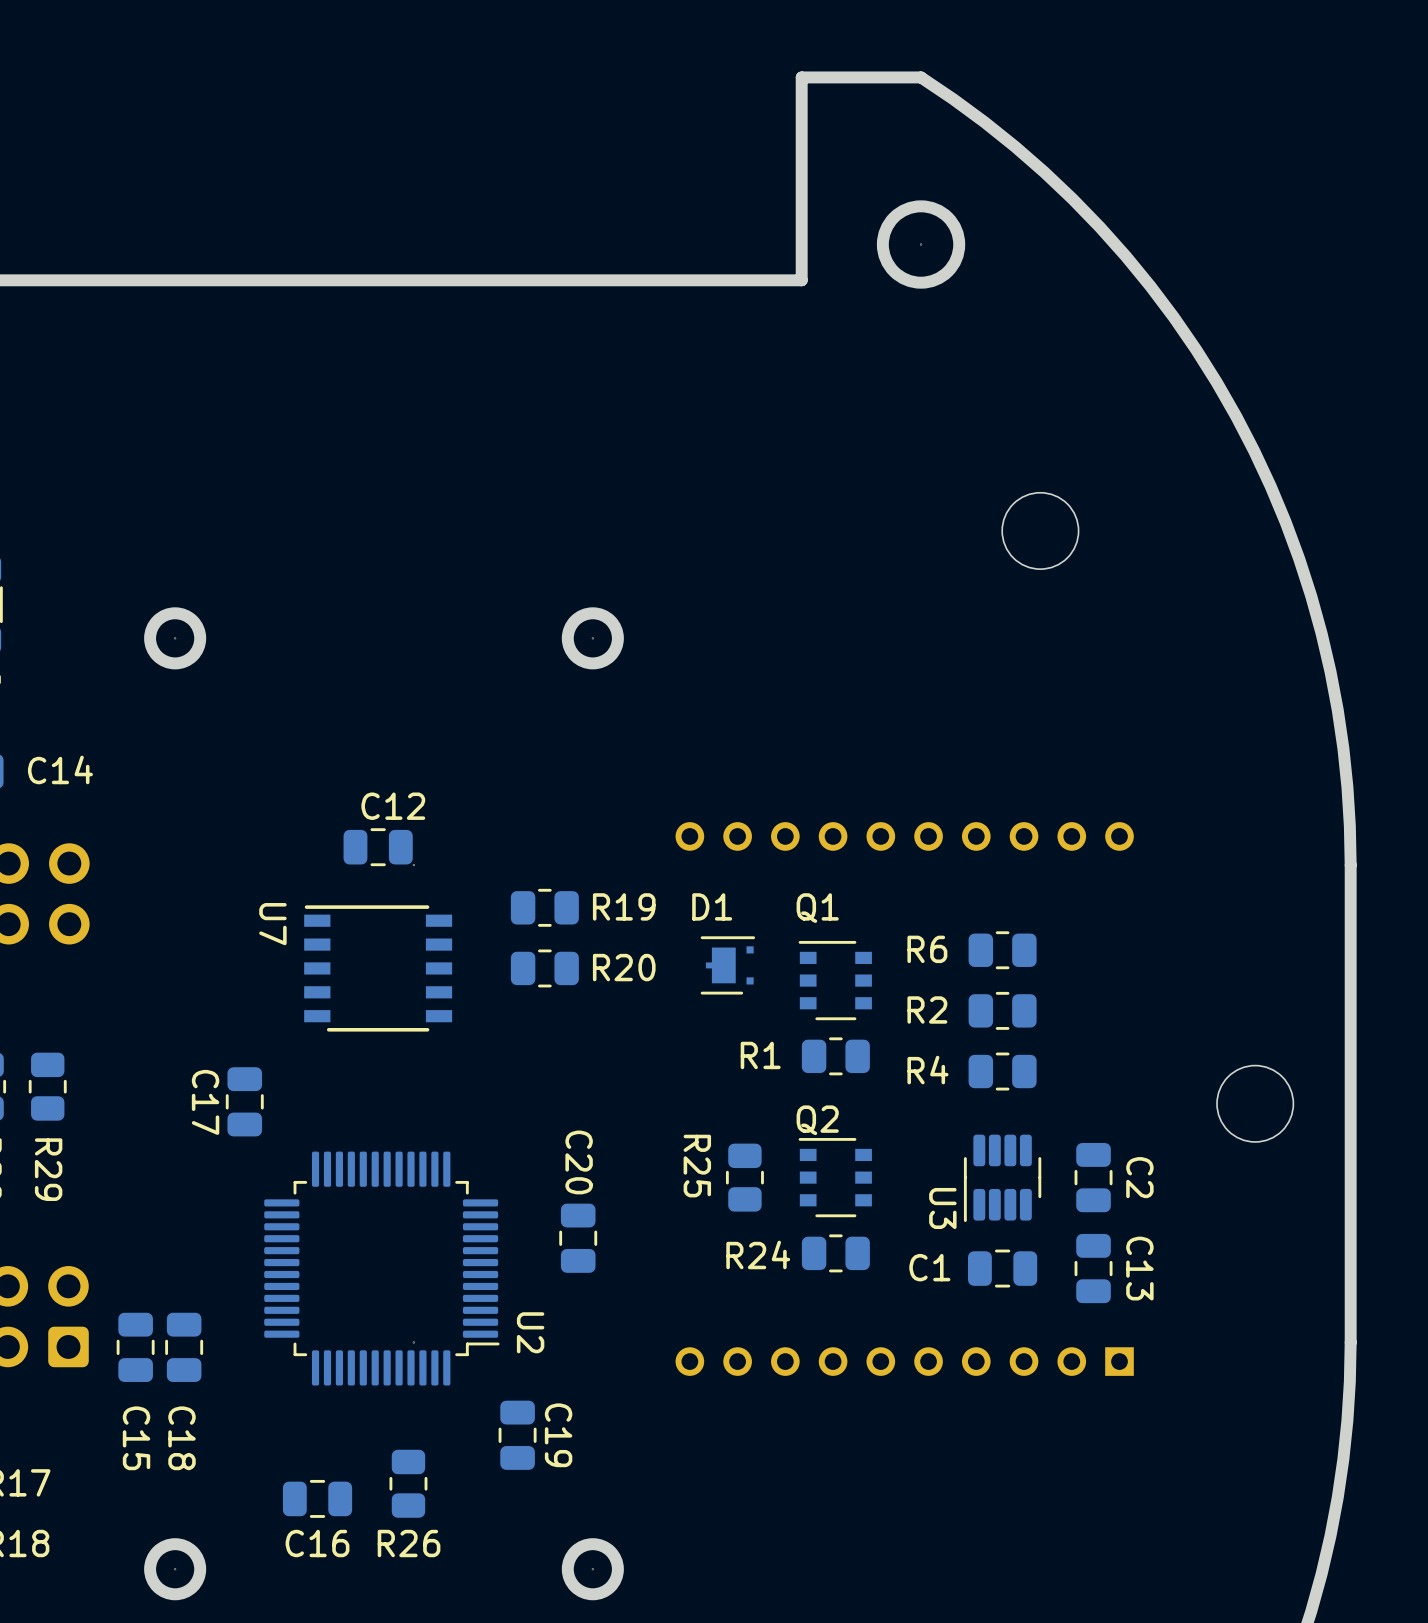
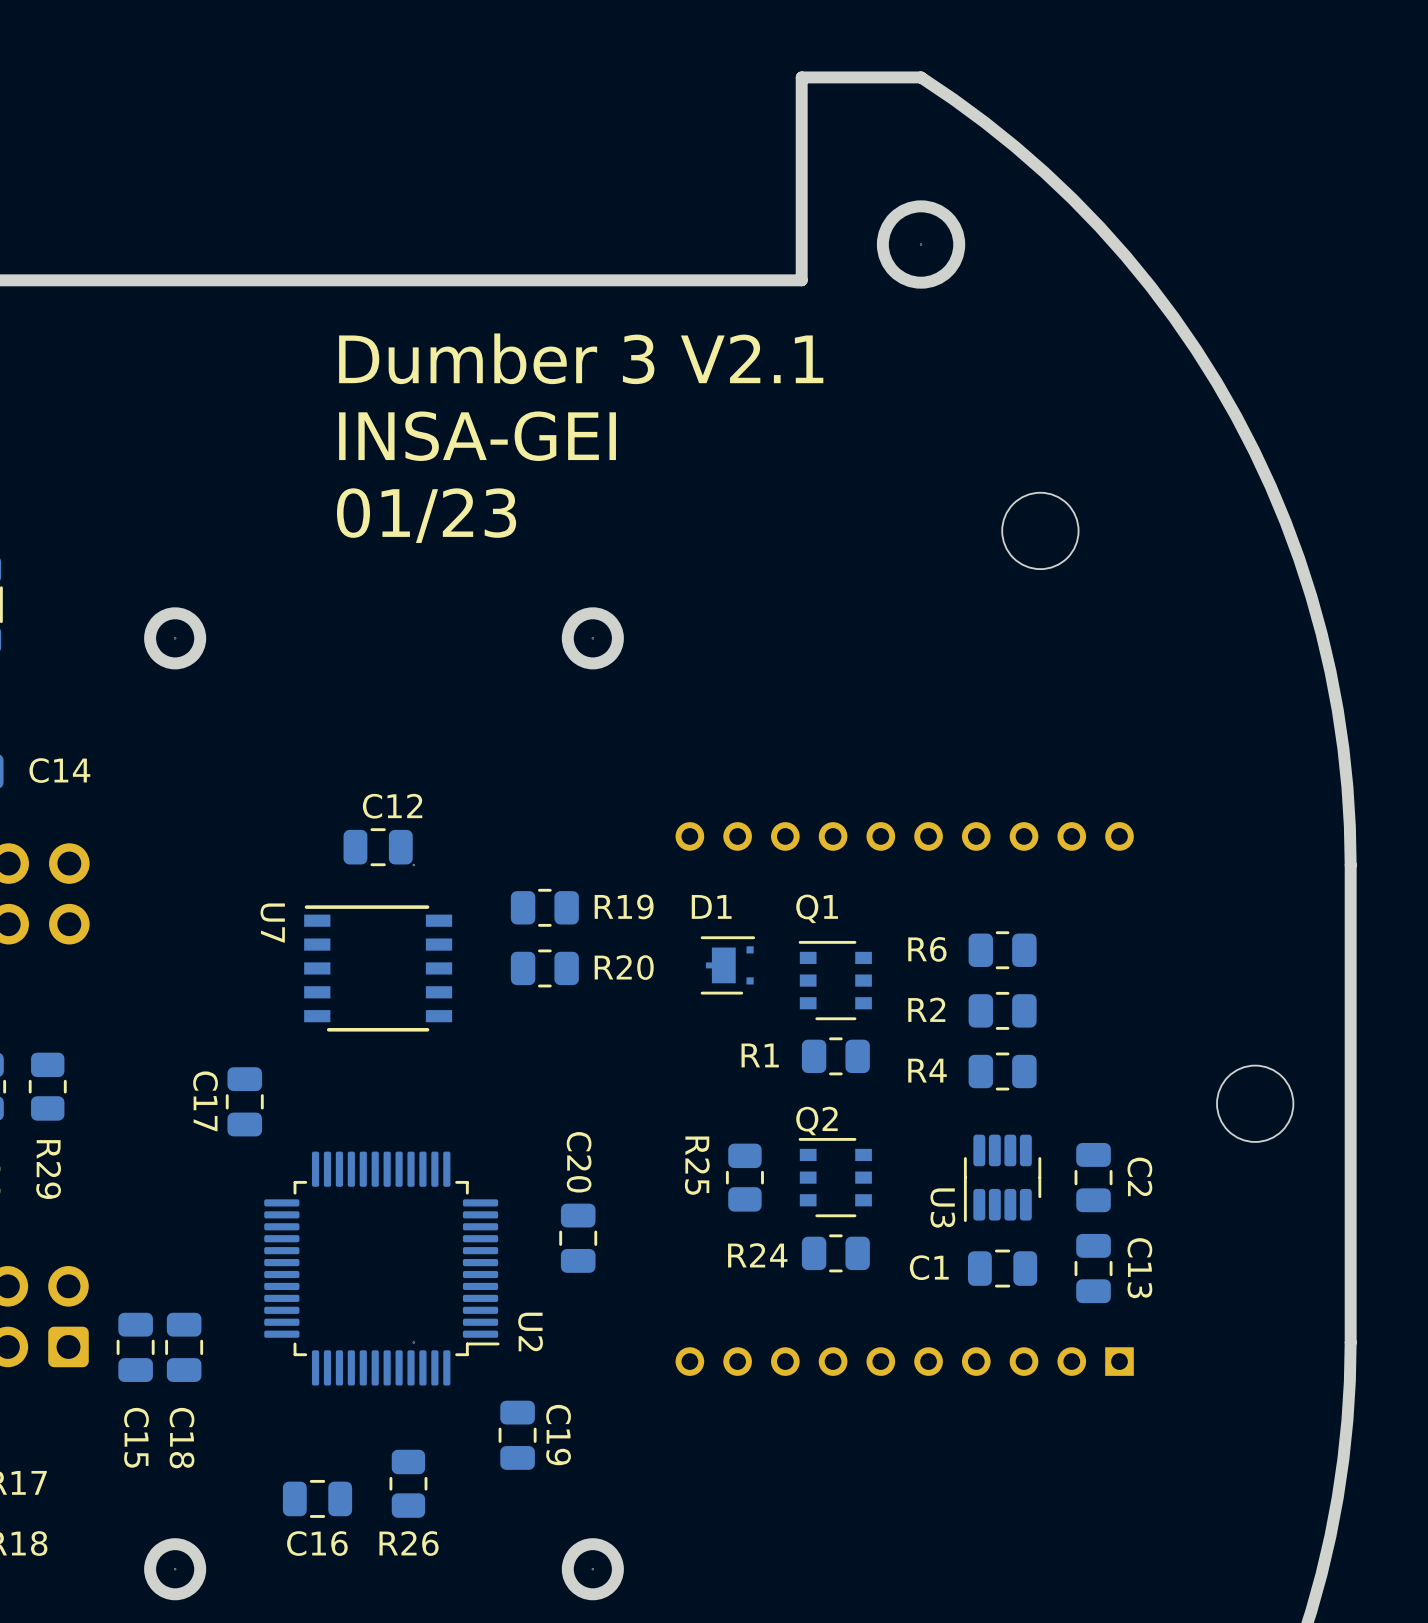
text: none -> Dumber 3 V2.1 (581, 358)
text: none -> INSA-GEI (477, 436)
text: none -> 01/23 (426, 515)

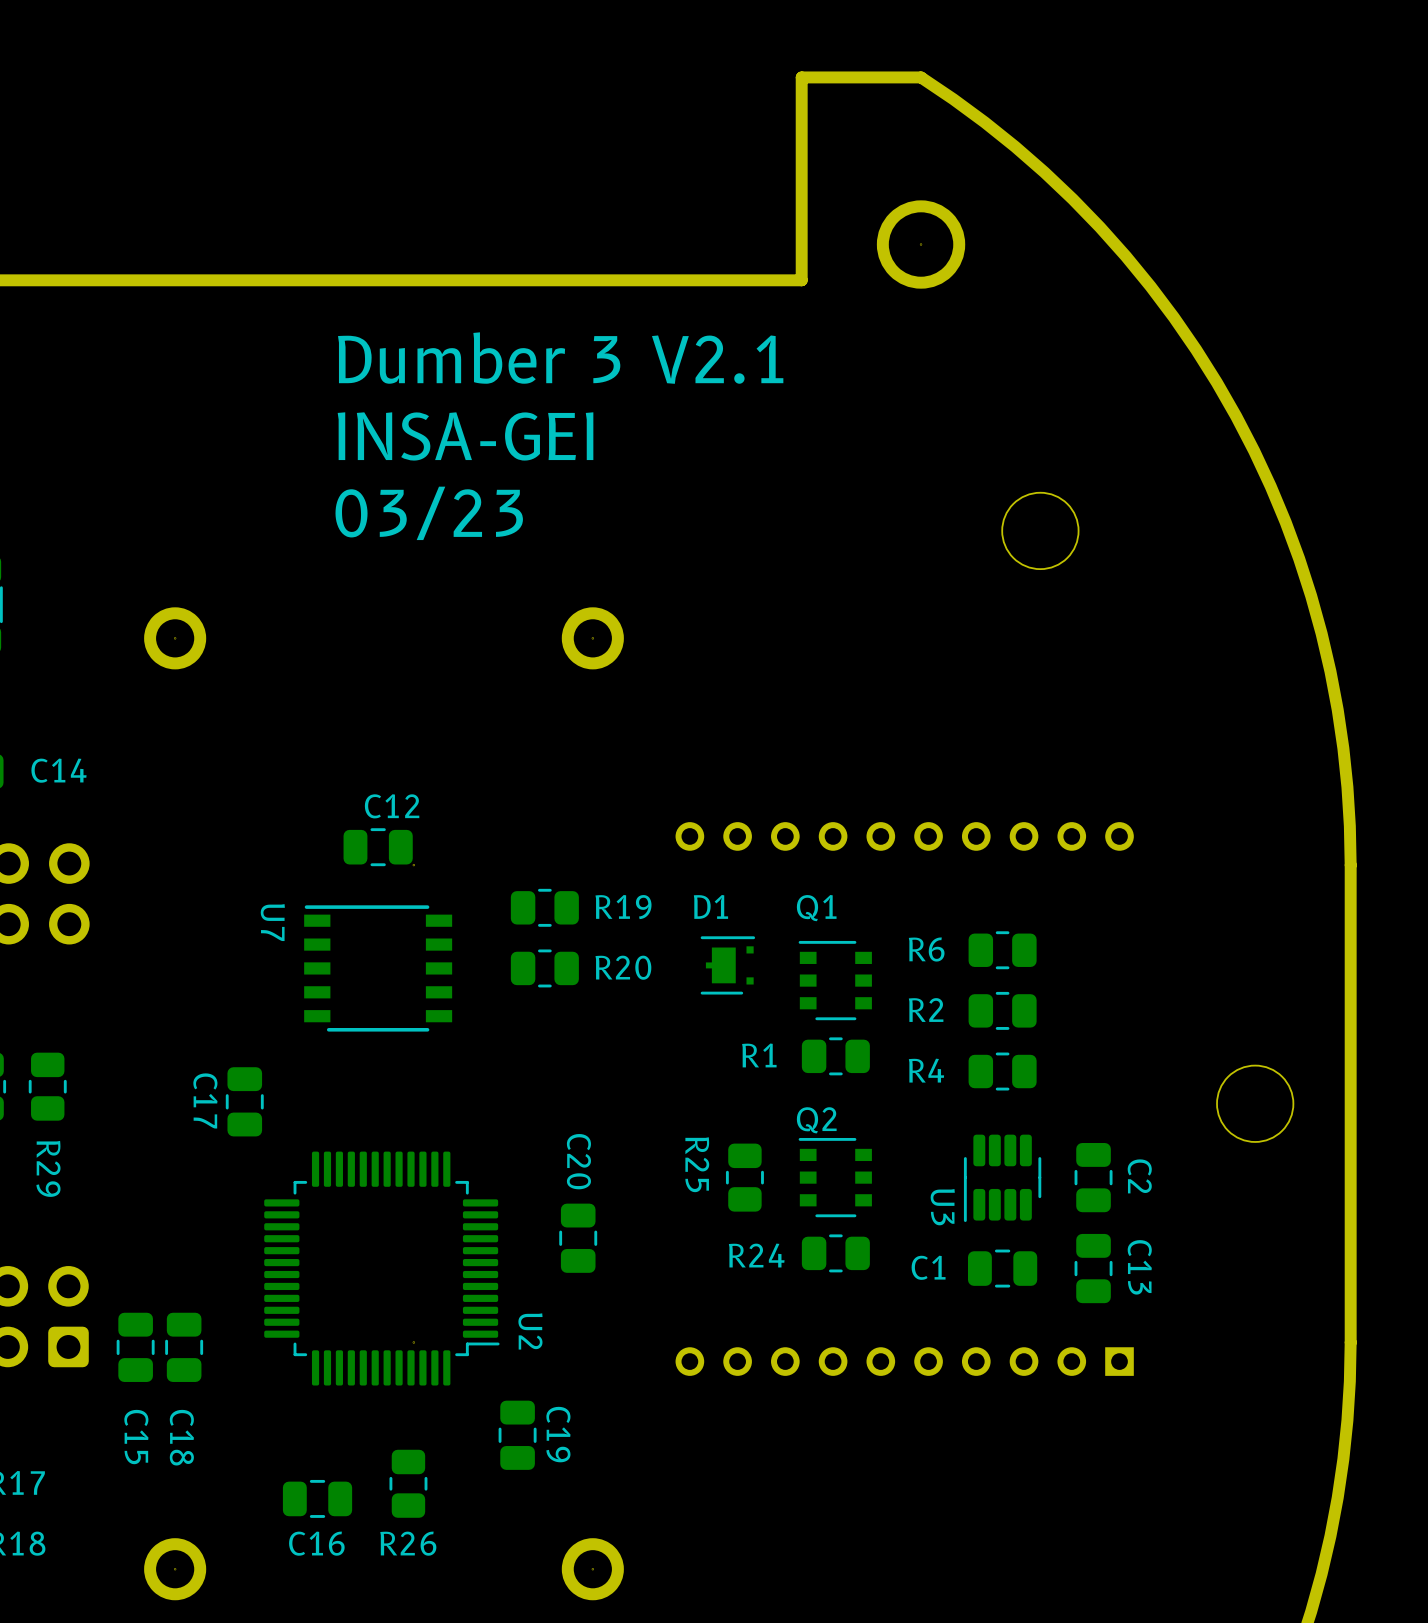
text: 01/23 (426, 515) -> 03/23 (429, 513)

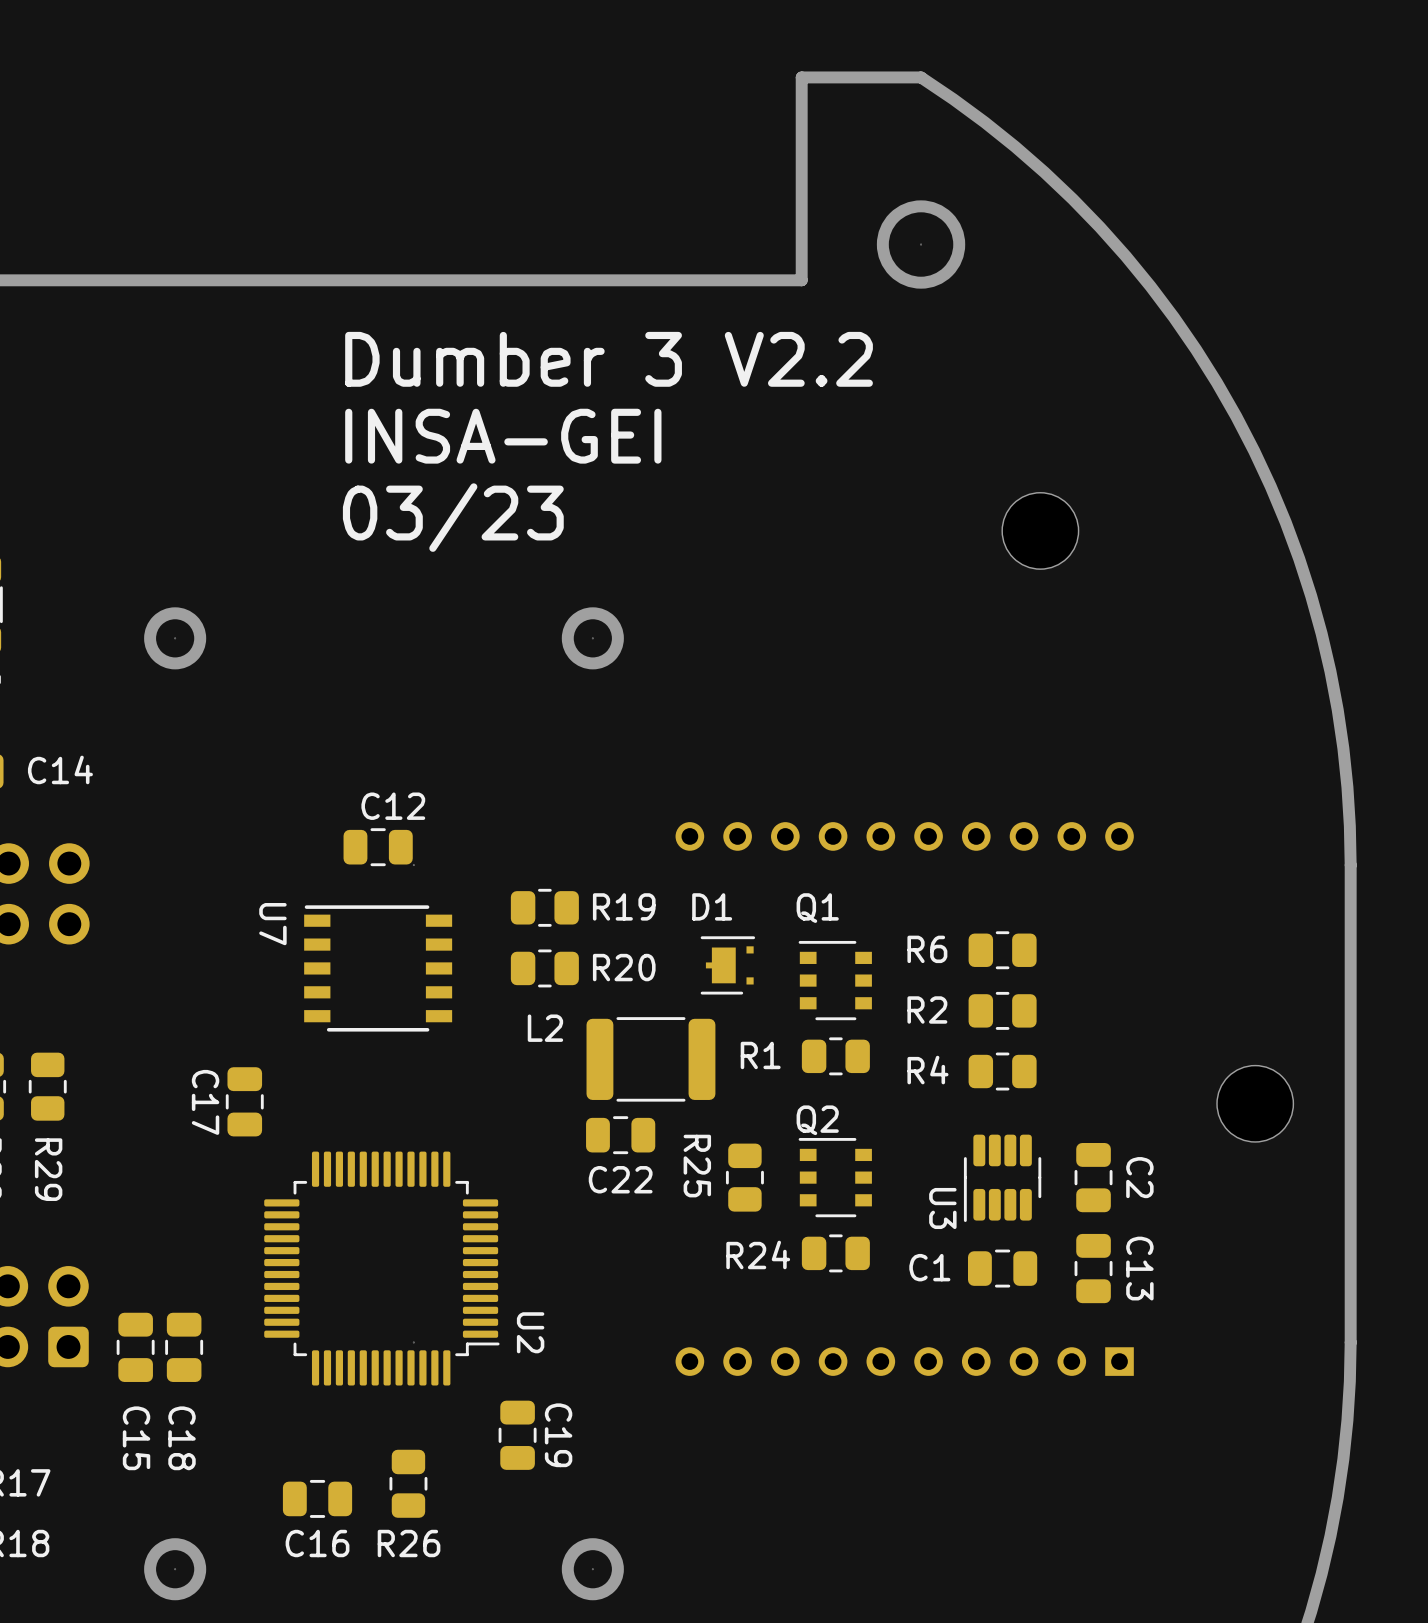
text: Dumber 3 V2.1 (560, 358) -> Dumber 3 V2.2 (609, 359)
L2: none -> (650, 1059)
C22: none -> (620, 1135)
C20: (578, 1238) -> none

